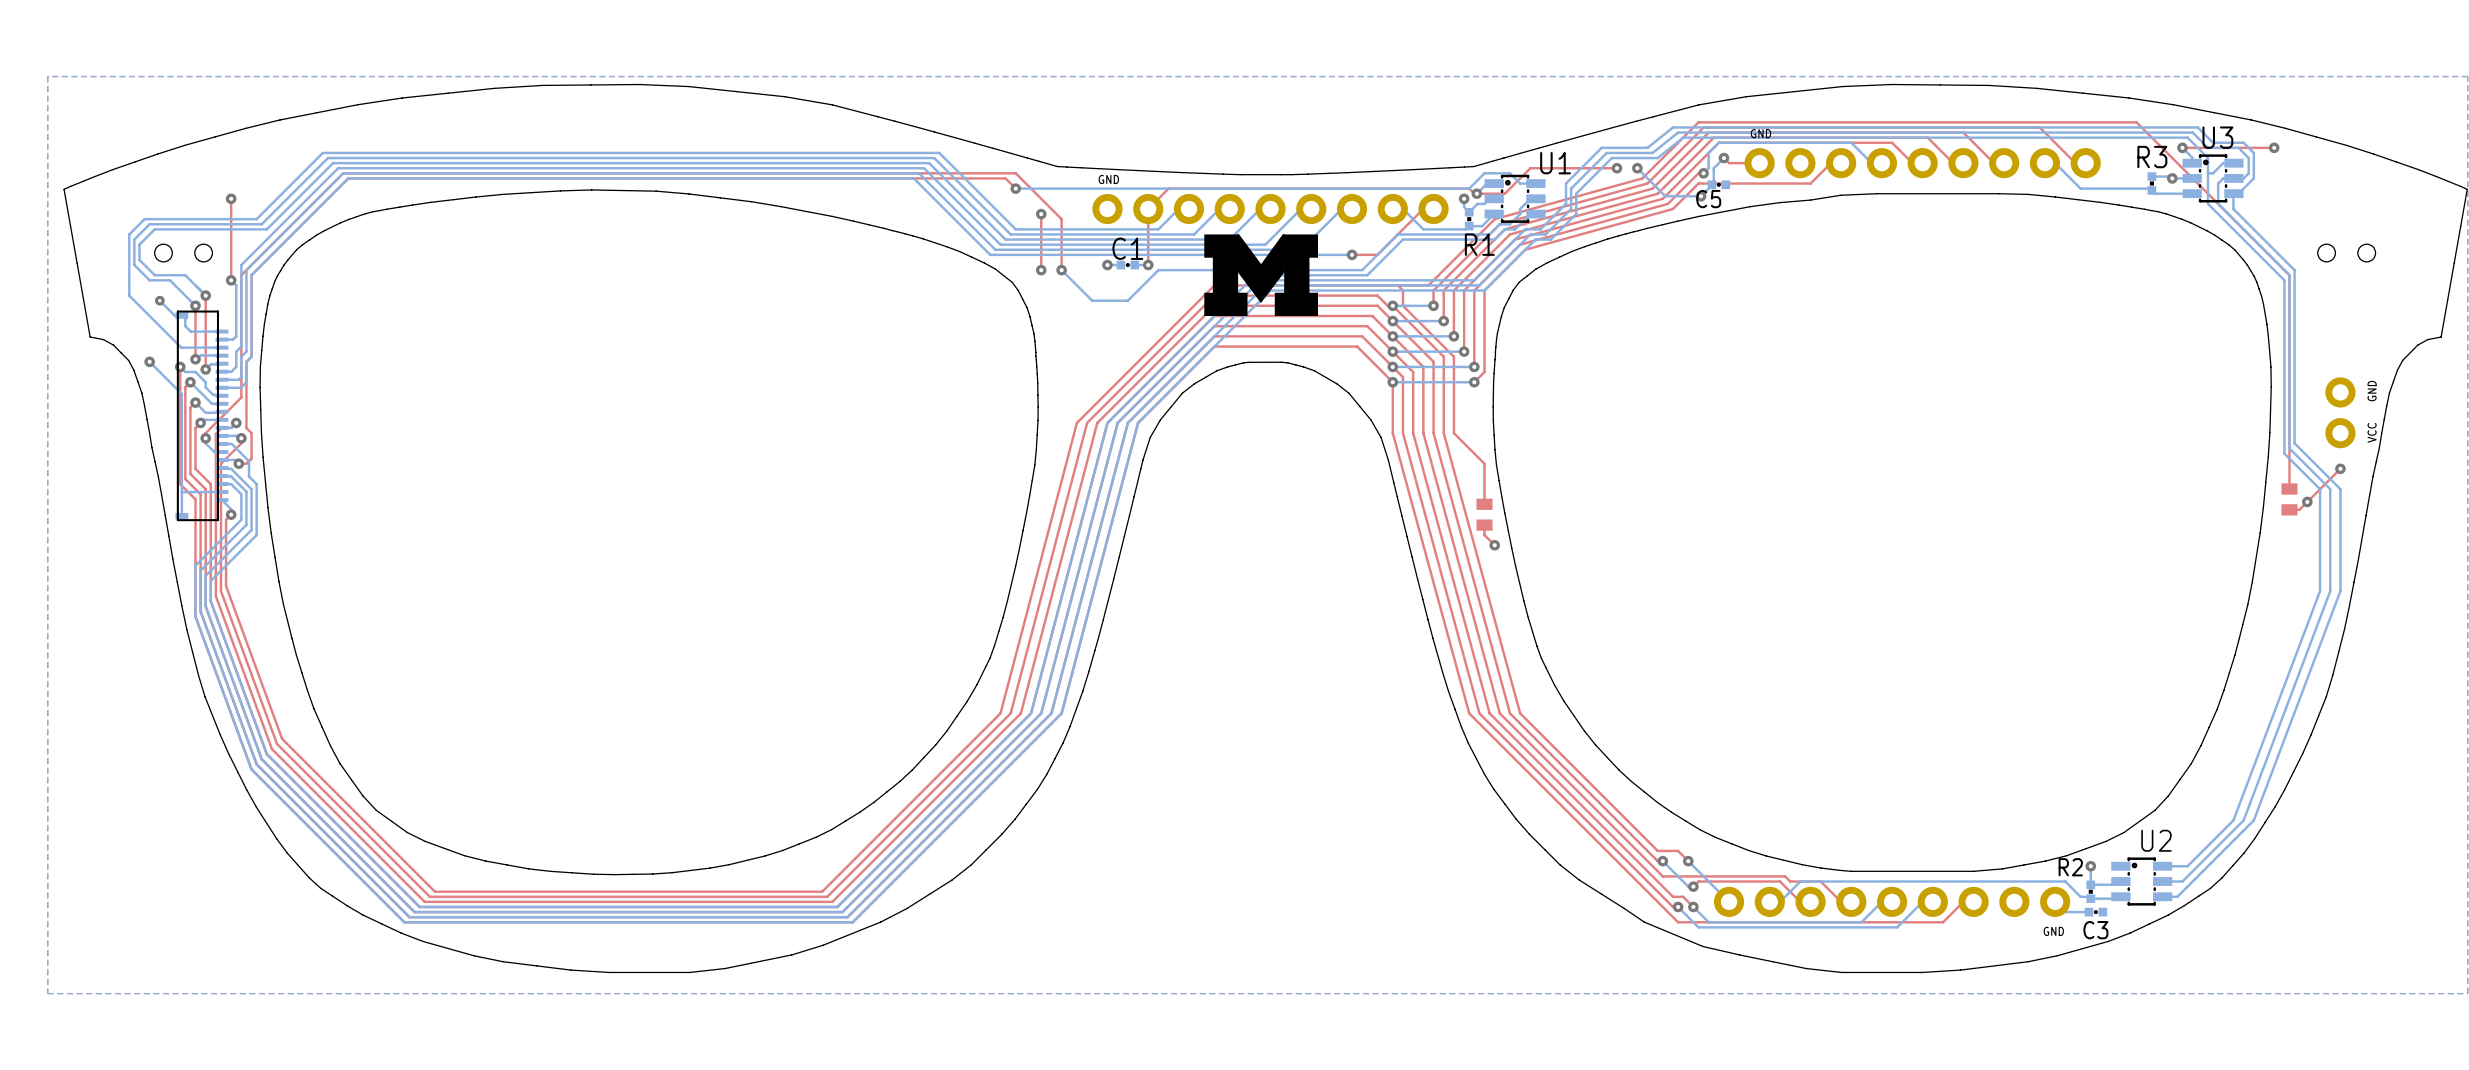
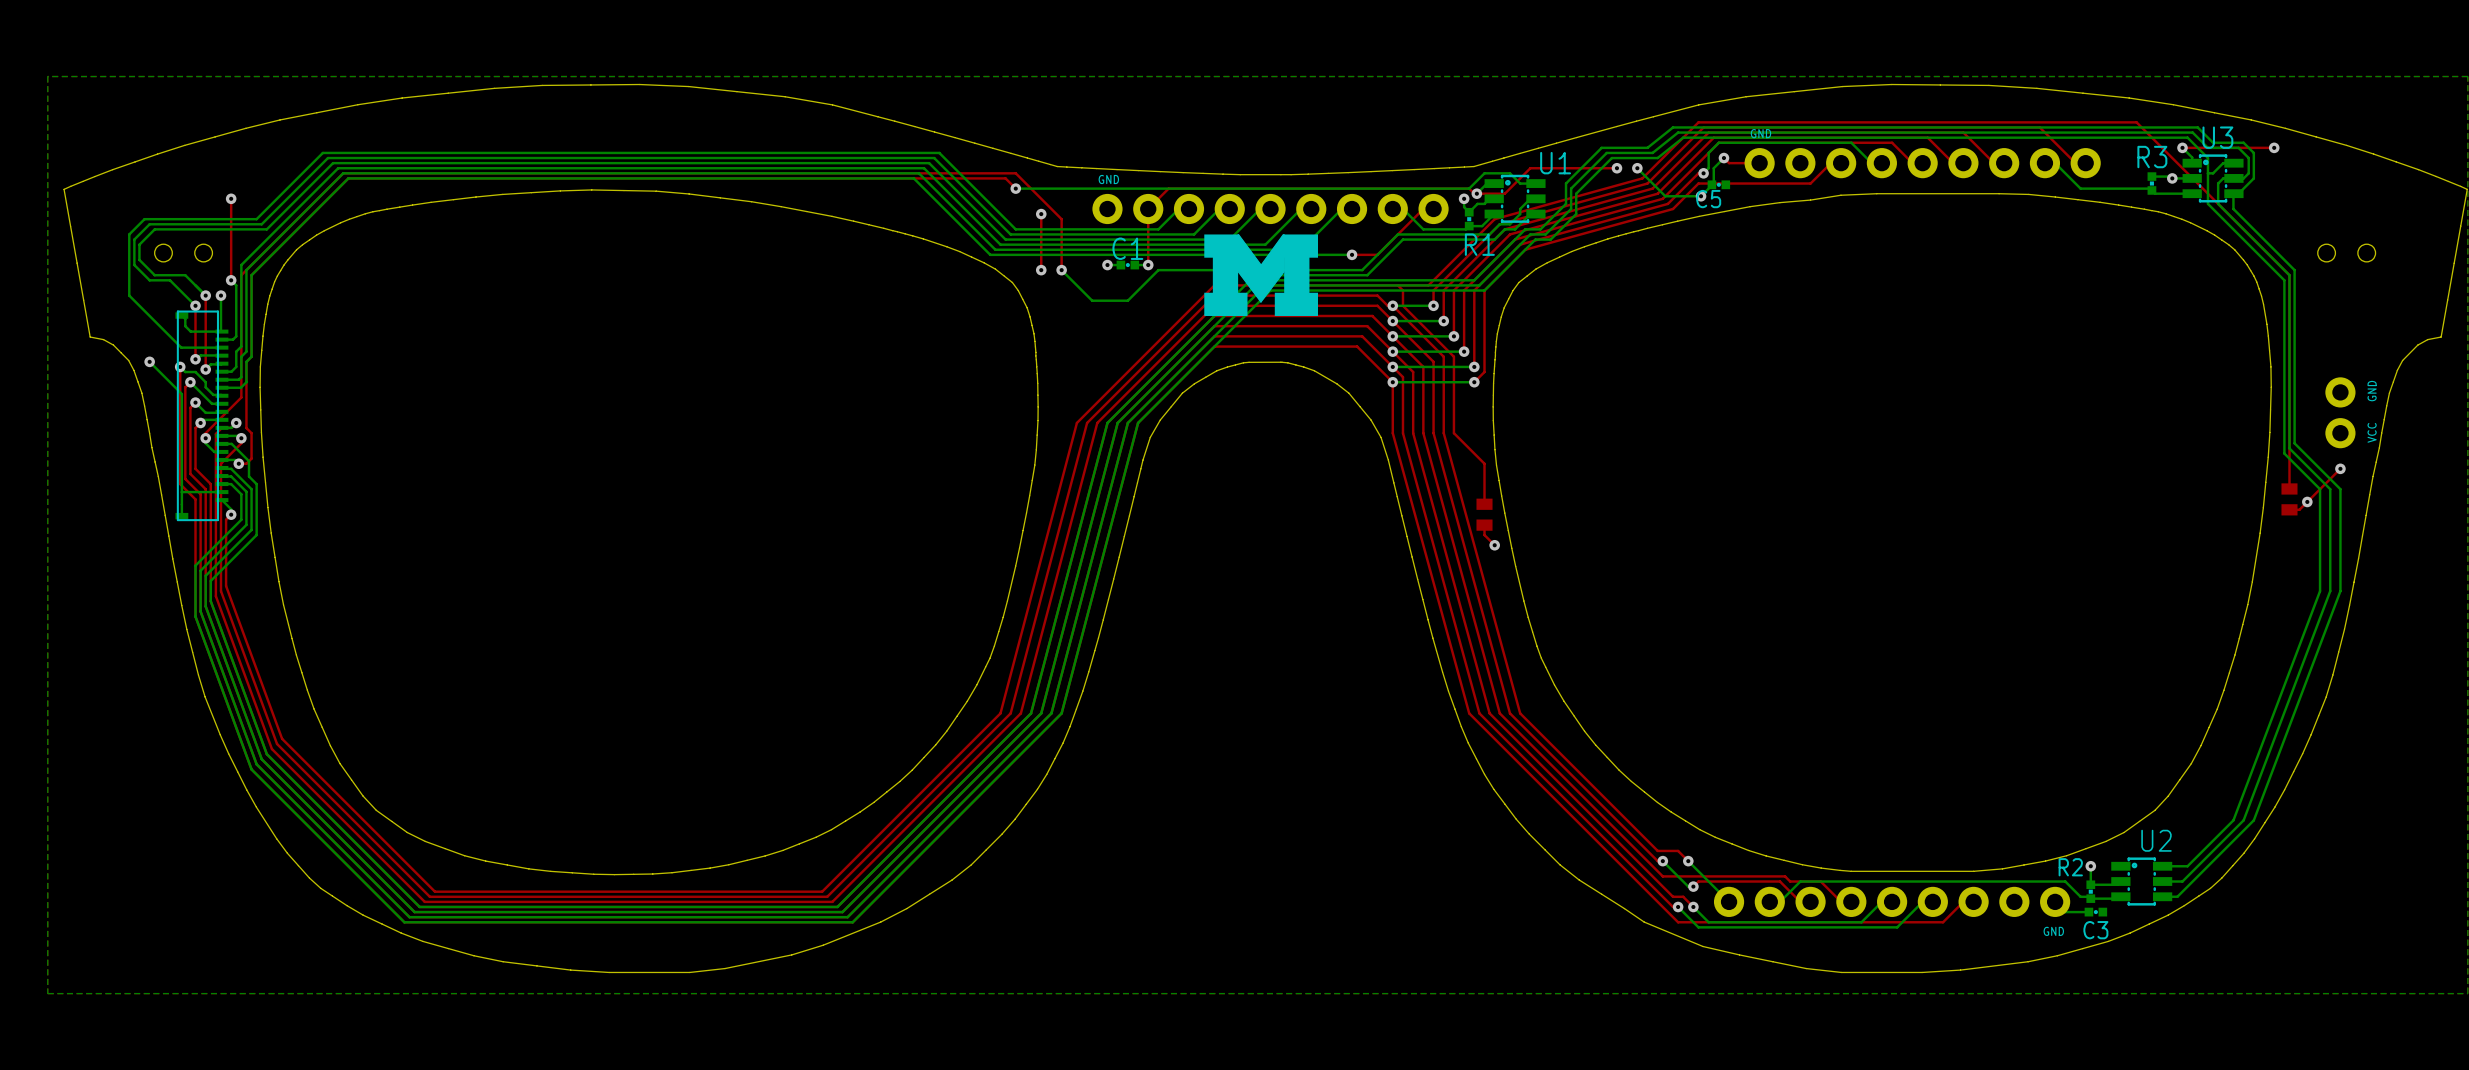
bottom track: none -> (220, 295) (220, 330)
via: none -> (220, 295)
bottom track: (159, 300) (175, 315) (185, 315) (185, 318) -> none
via: (159, 300) -> none

